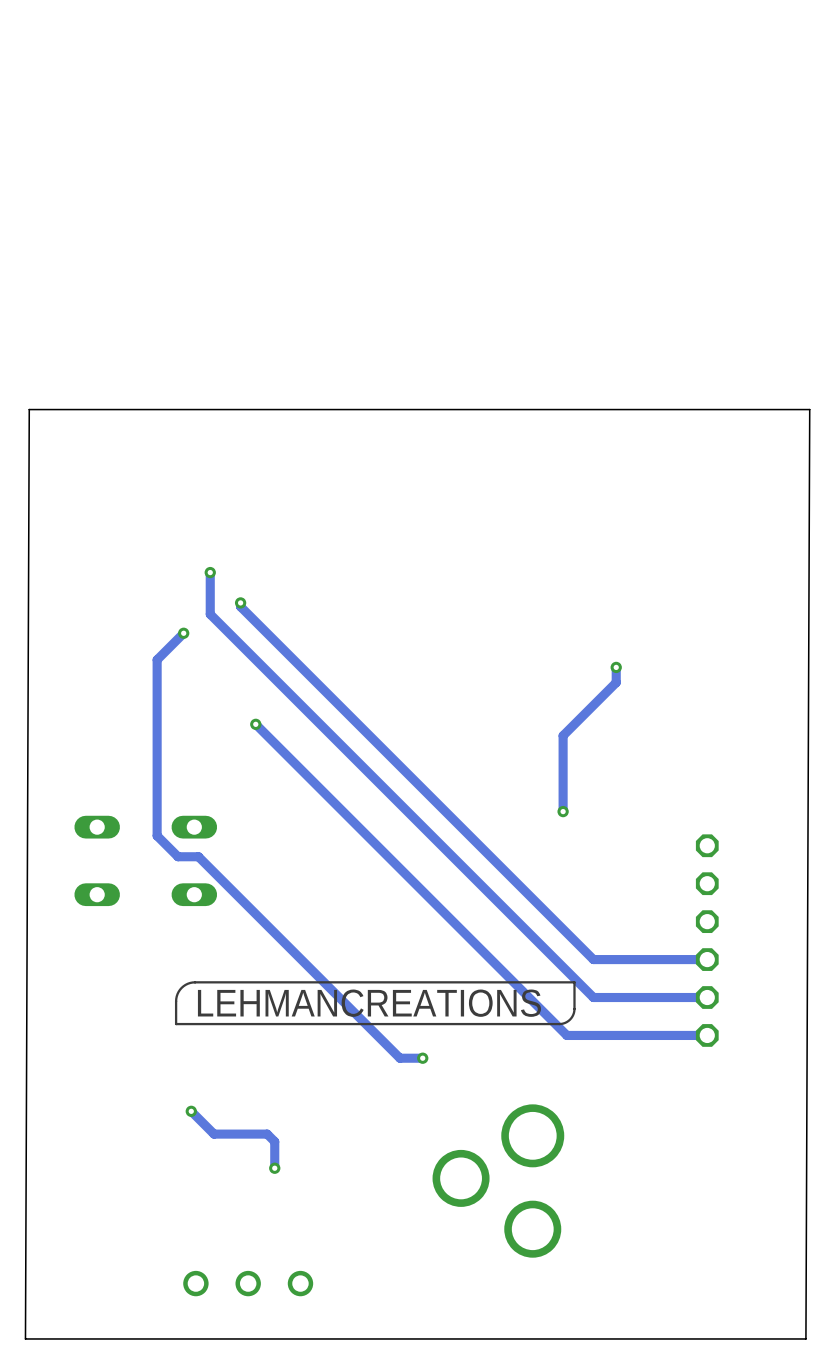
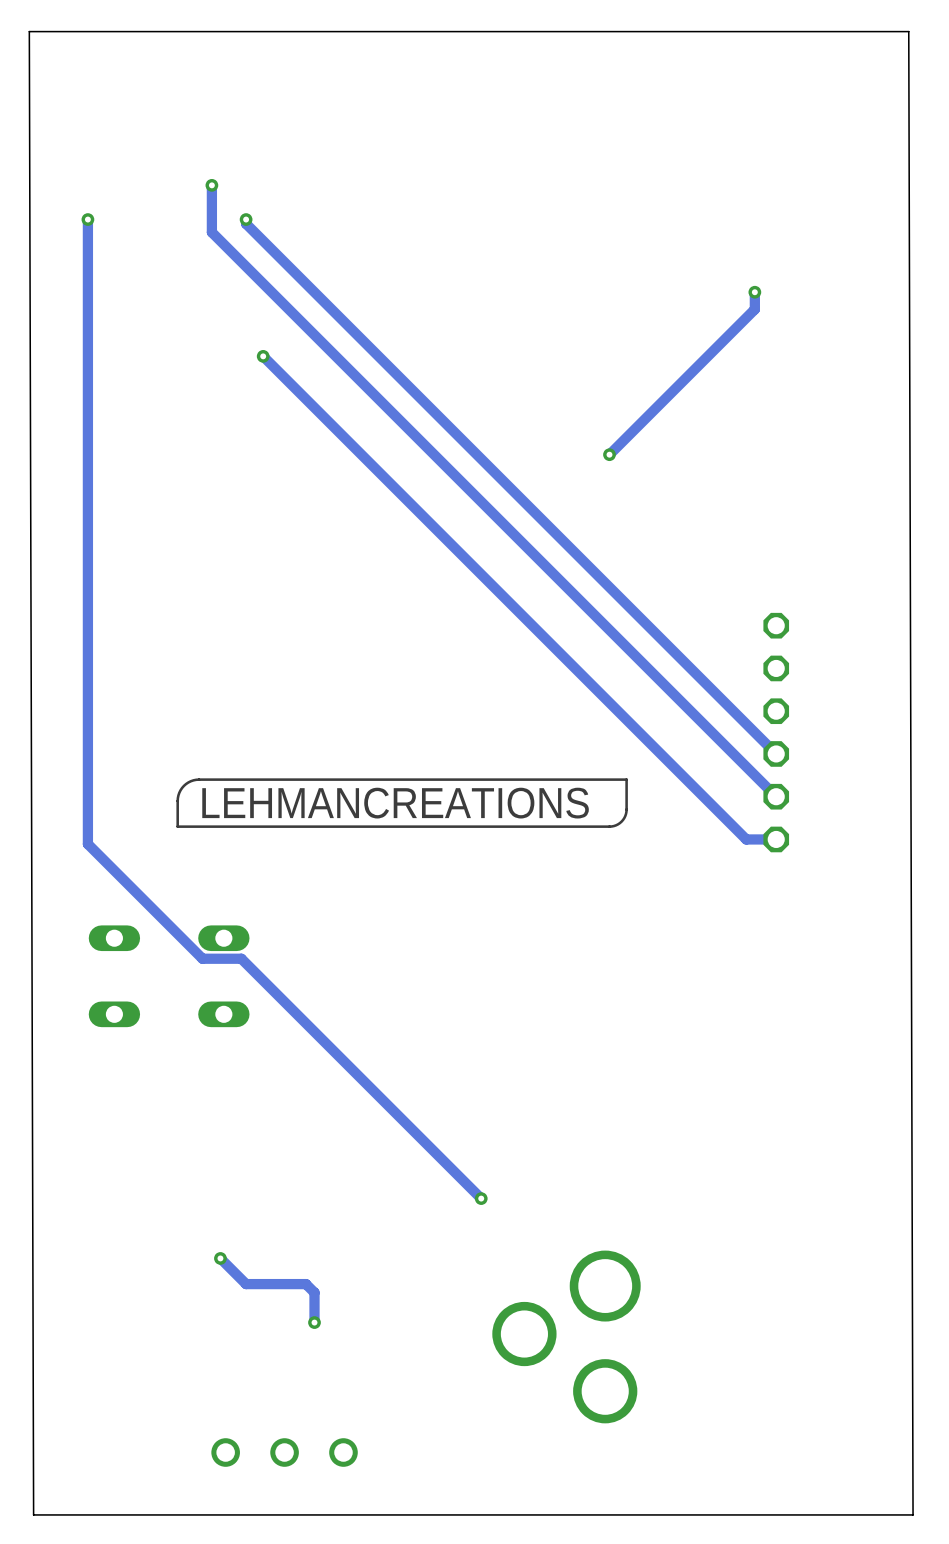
track: none -> (211, 185) (211, 232) (776, 796)
via: none -> (211, 185)
via: none -> (87, 219)
track: none -> (246, 219) (246, 223) (776, 753)
via: none -> (246, 219)
track: none -> (754, 292) (754, 309) (609, 454)
via: none -> (754, 292)
track: none -> (263, 356) (746, 839) (776, 839)
via: none -> (263, 356)
via: none -> (609, 454)
track: (210, 572) (210, 614) (593, 997) (707, 997) -> none
via: (210, 572) -> none
track: (240, 602) (240, 606) (593, 959) (707, 959) -> none
via: (240, 602) -> none
track: (183, 633) (157, 659) (157, 835) (178, 856) (198, 856) (399, 1058) (422, 1058) -> (87, 219) (87, 844) (202, 958) (241, 958) (481, 1198)
via: (183, 633) -> none
track: (616, 667) (616, 682) (563, 735) (563, 811) -> none
via: (616, 667) -> none
track: (255, 724) (566, 1035) (707, 1035) -> none
via: (255, 724) -> none
via: (563, 811) -> none
part position: (707, 940) -> (776, 732)
line: (574, 982) (573, 1012) (570, 1019) (561, 1023) (176, 1024) (177, 994) (183, 986) (192, 982) (574, 982) -> (626, 779) (626, 813) (621, 821) (611, 826) (177, 826) (179, 792) (186, 784) (196, 779) (626, 779)
text position: LEHMANCREATIONS (369, 1003) -> LEHMANCREATIONS (395, 803)
board edge: (805, 1338) (809, 409) (29, 409) (25, 1338) -> (913, 1514) (908, 31) (29, 31) (33, 1514)

